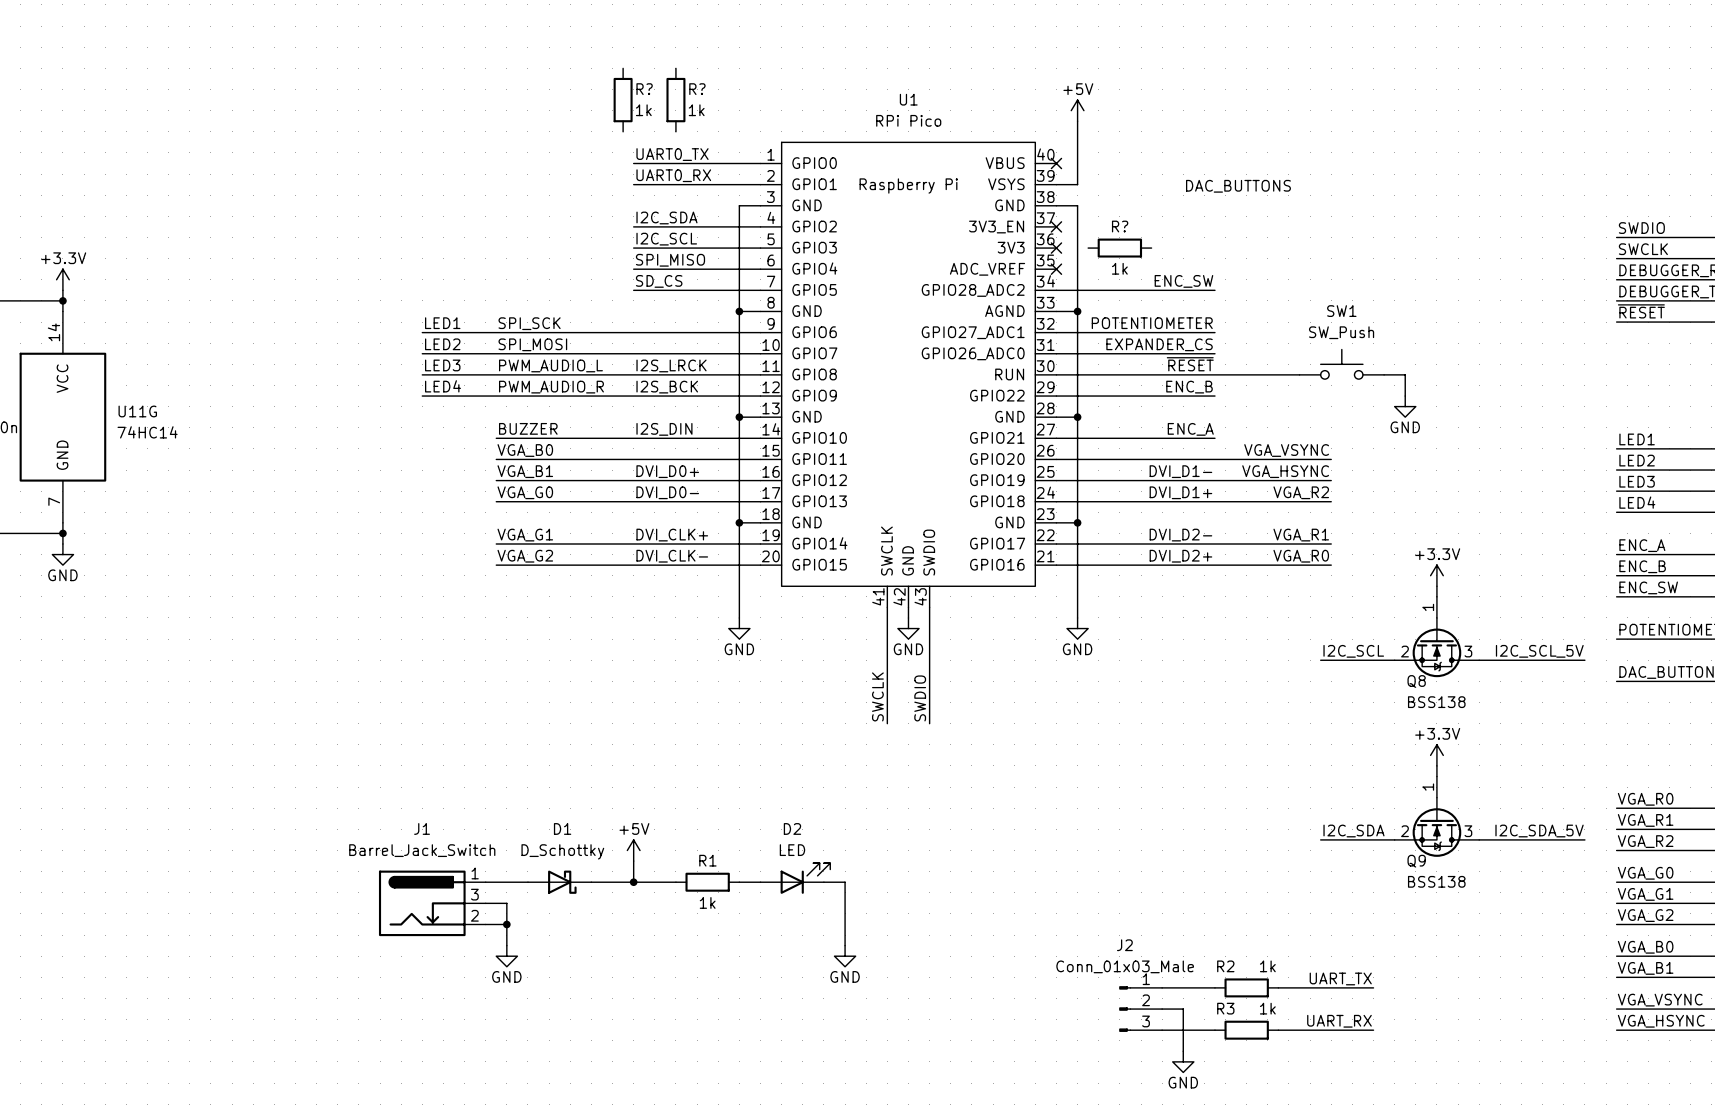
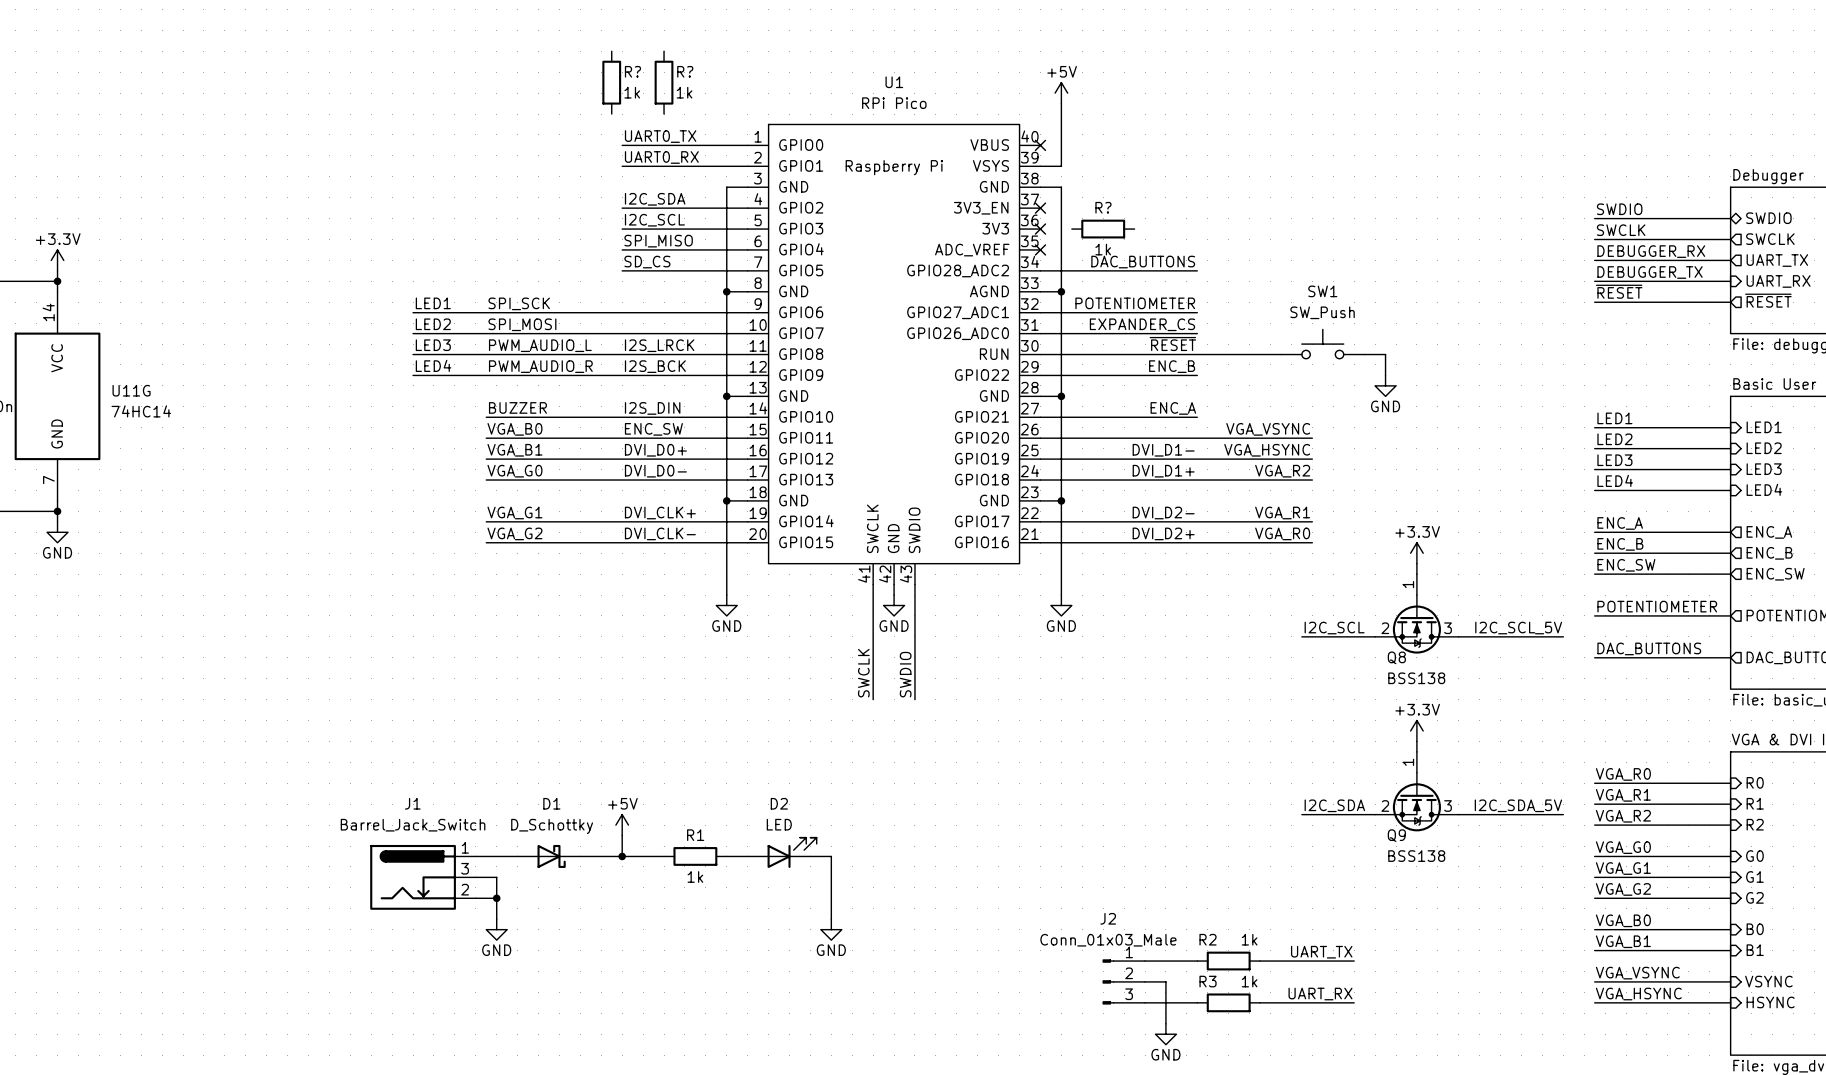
label: DAC_BUTTONS (1238, 186) -> none
label: ENC_SW (1183, 281) -> DAC_BUTTONS (1143, 262)
label: none -> ENC_SW (653, 429)

